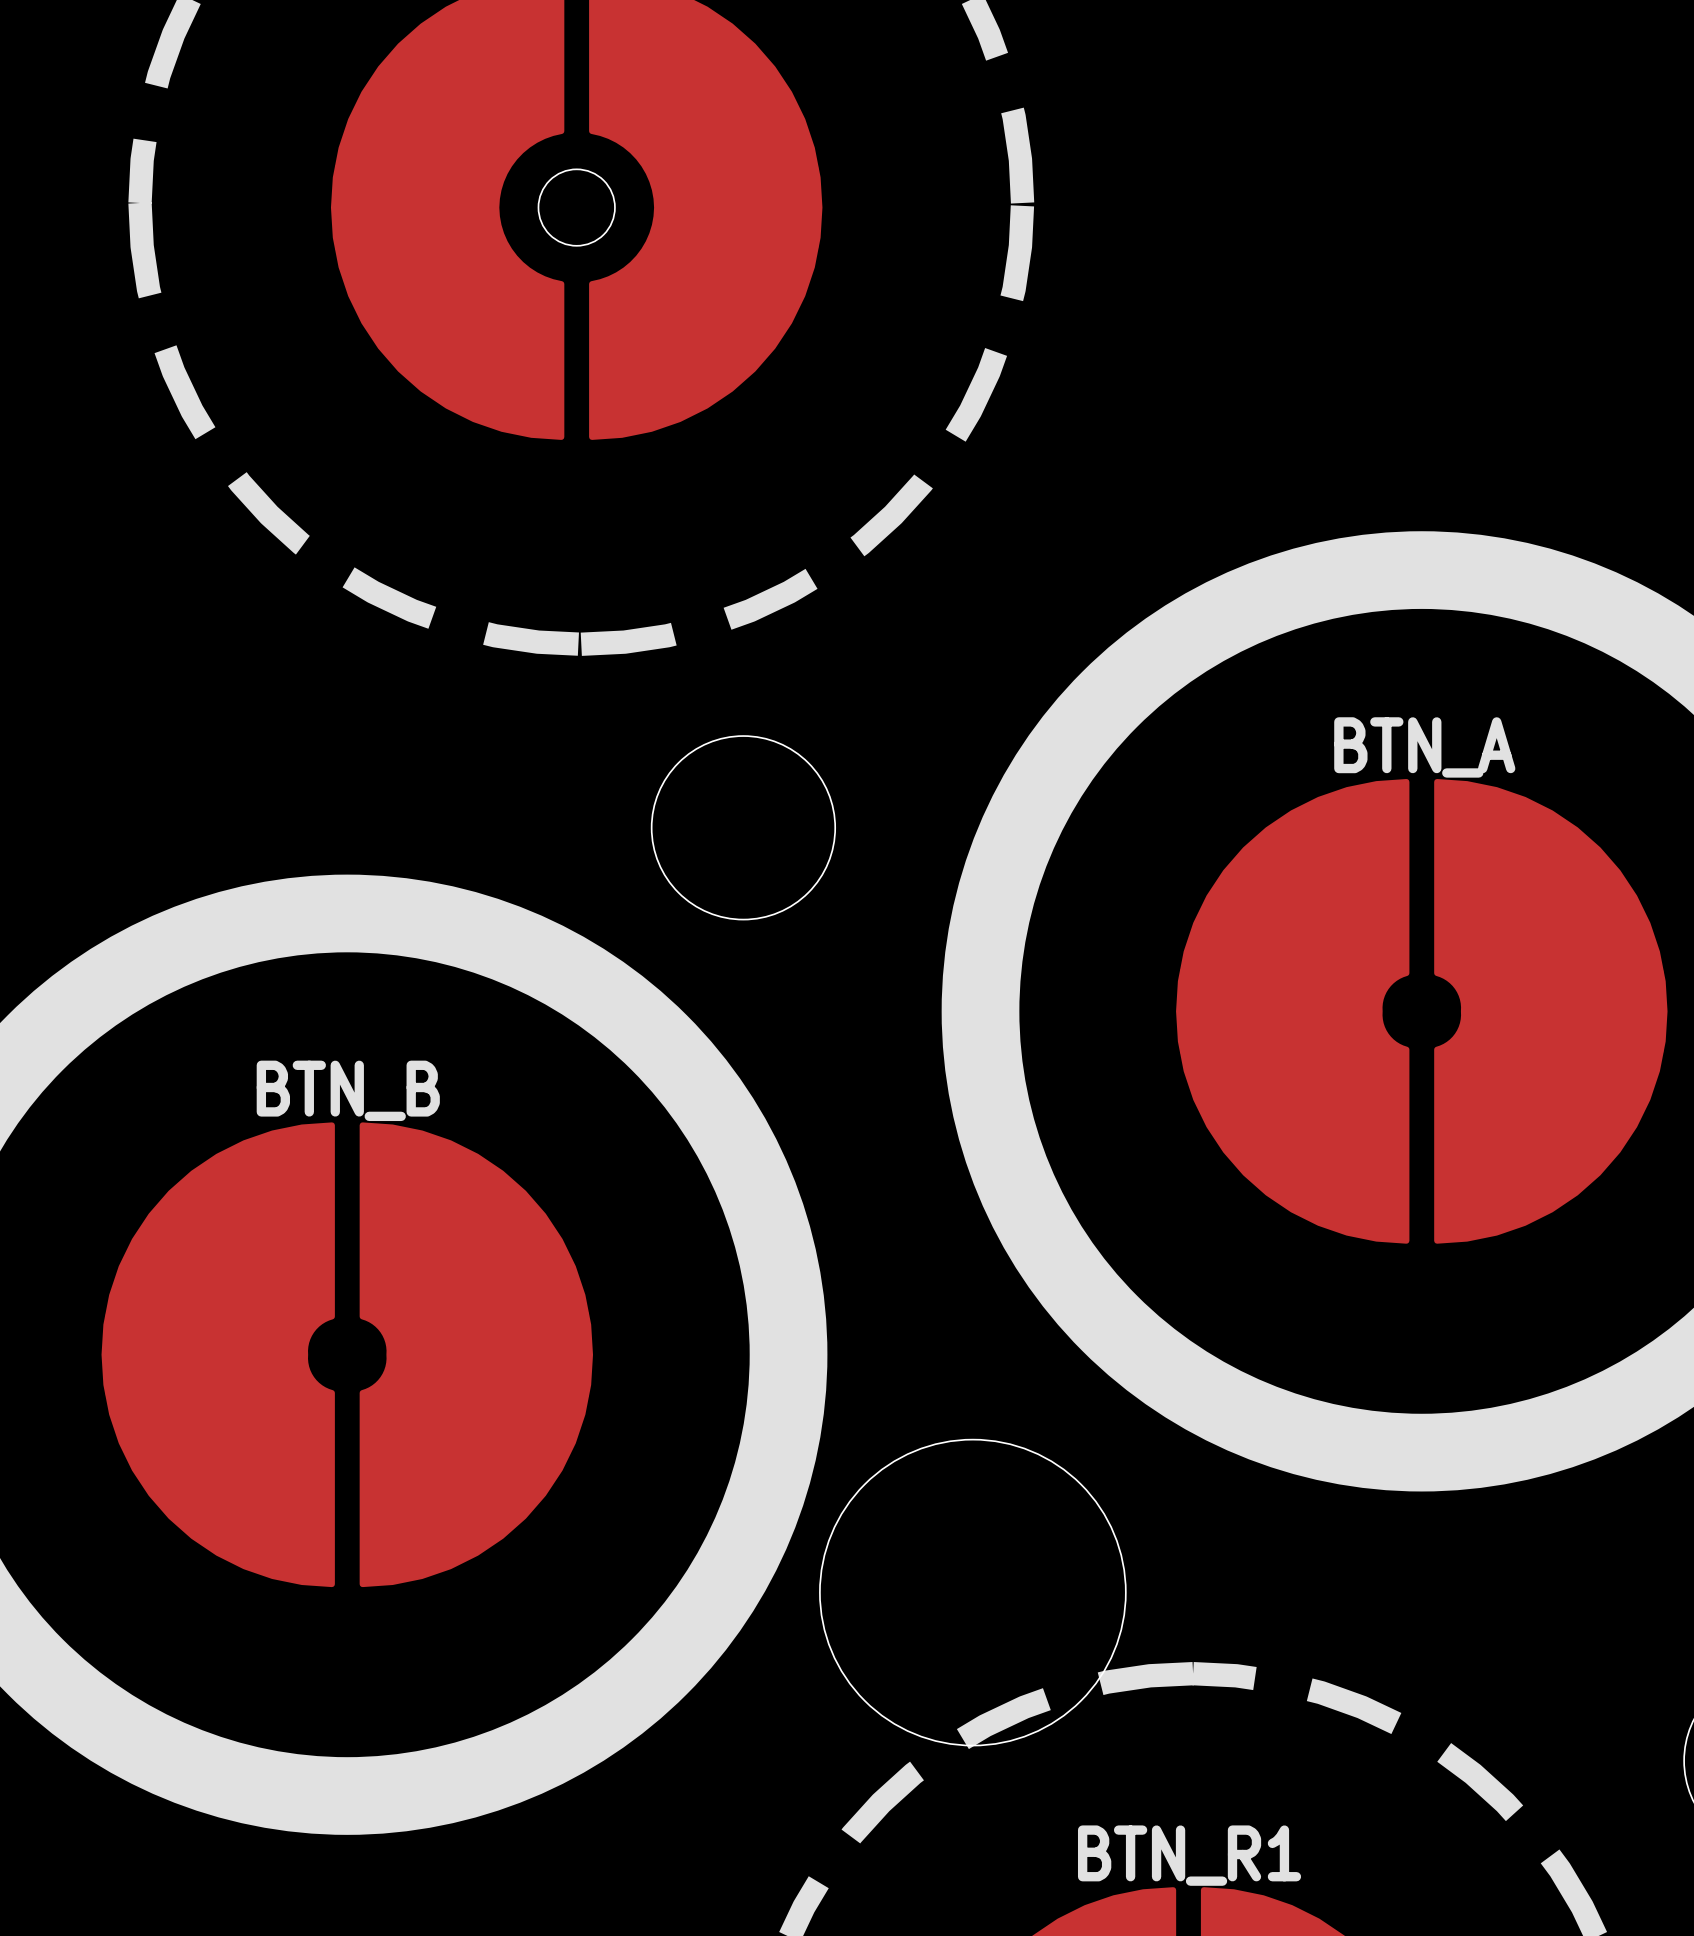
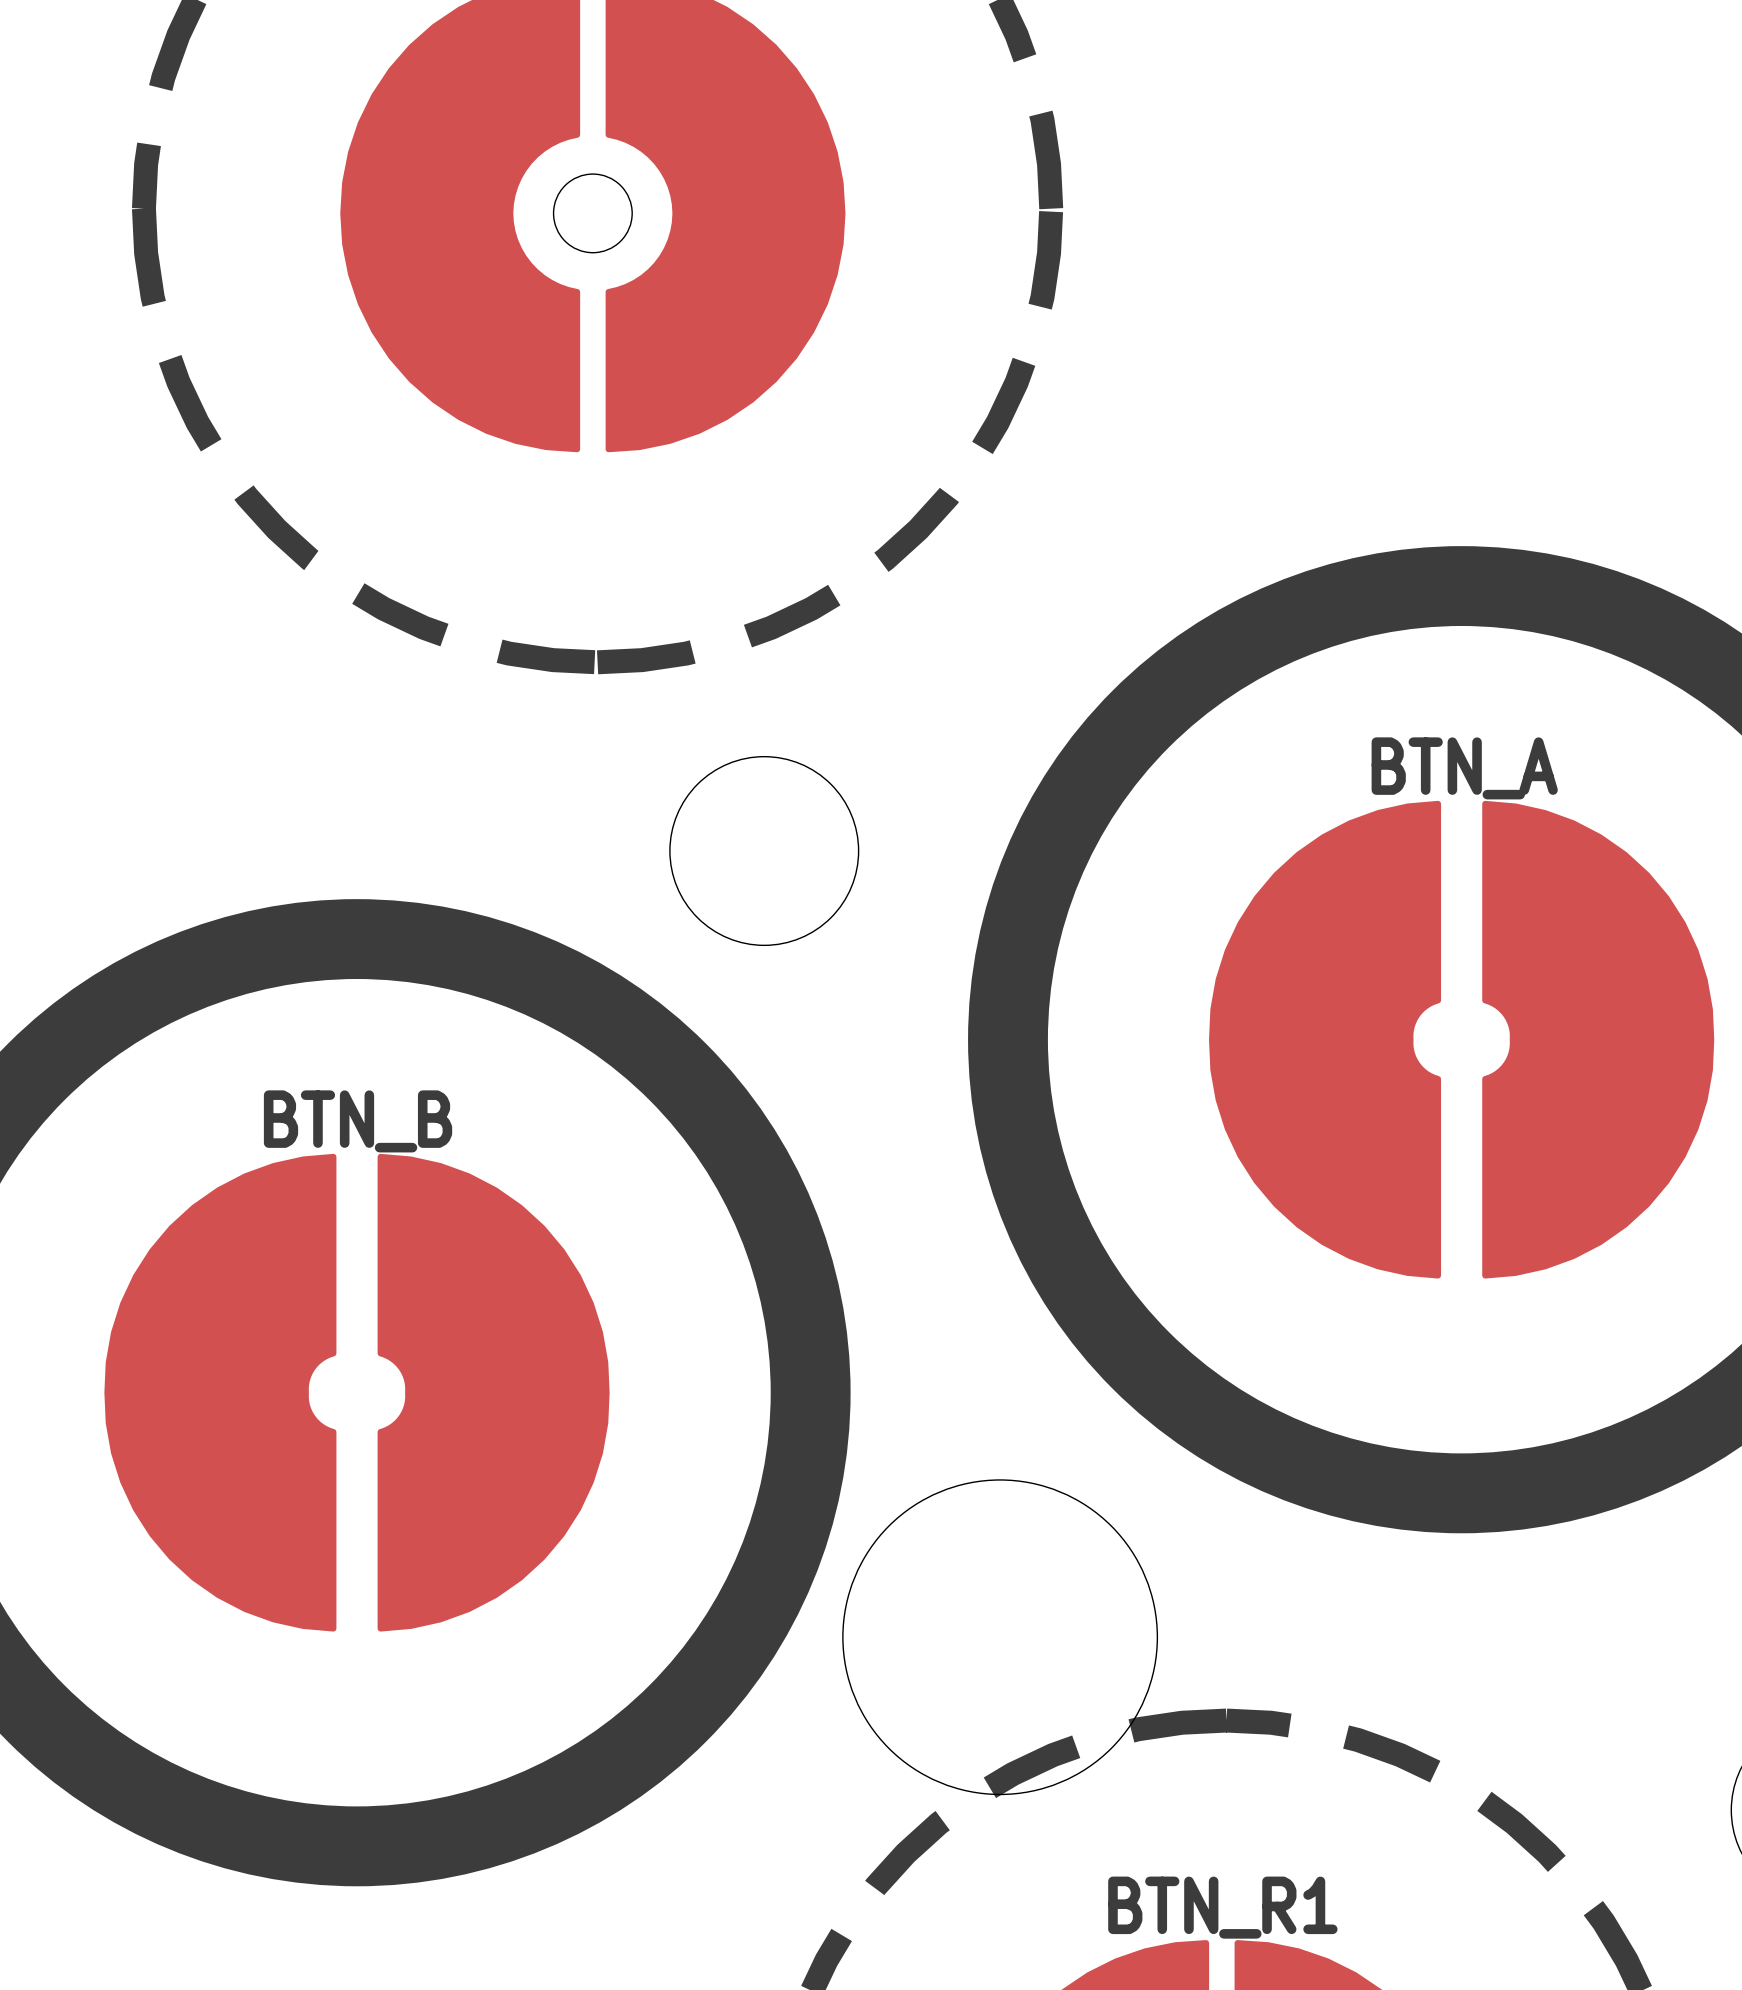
BTN_A footprint: [1176, 779, 1668, 1244] -> [1209, 800, 1715, 1279]
BTN_B footprint: [101, 1122, 594, 1588] -> [104, 1153, 610, 1632]

